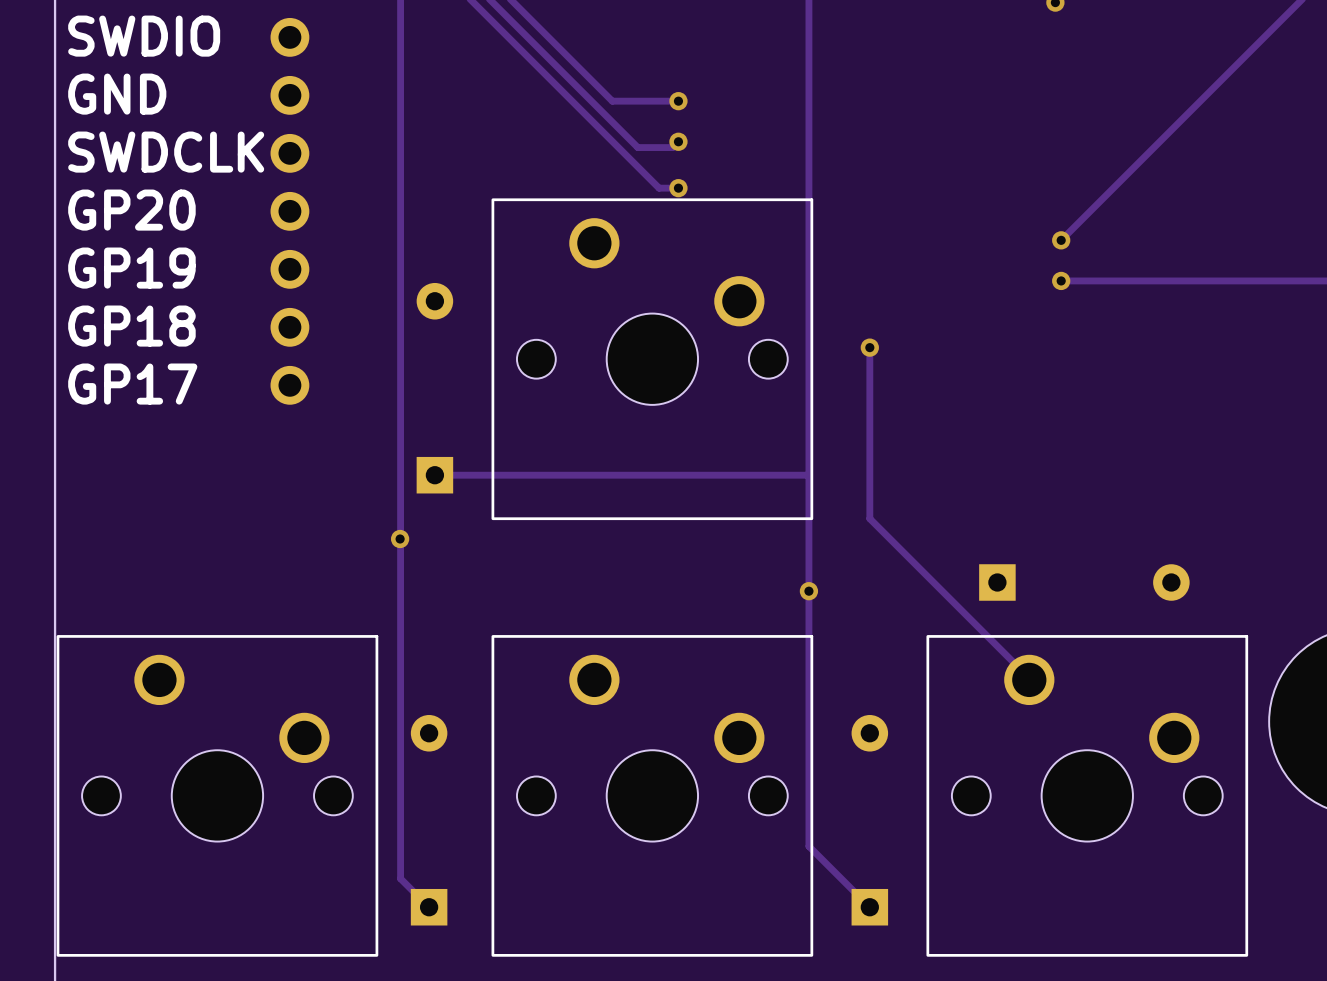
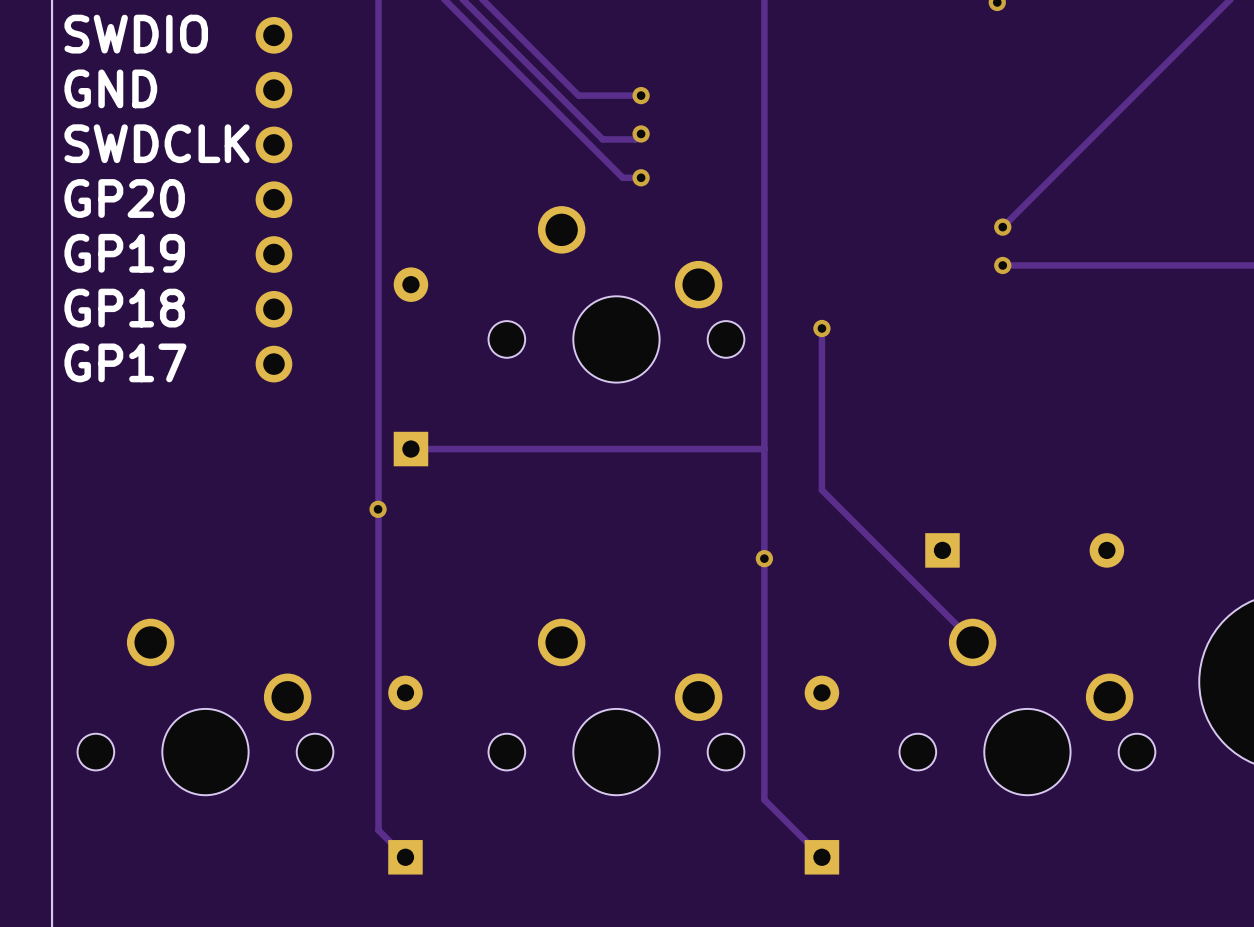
part: (652, 359) -> none
part: (217, 795) -> none
part: (652, 795) -> none
part: (1087, 795) -> none

